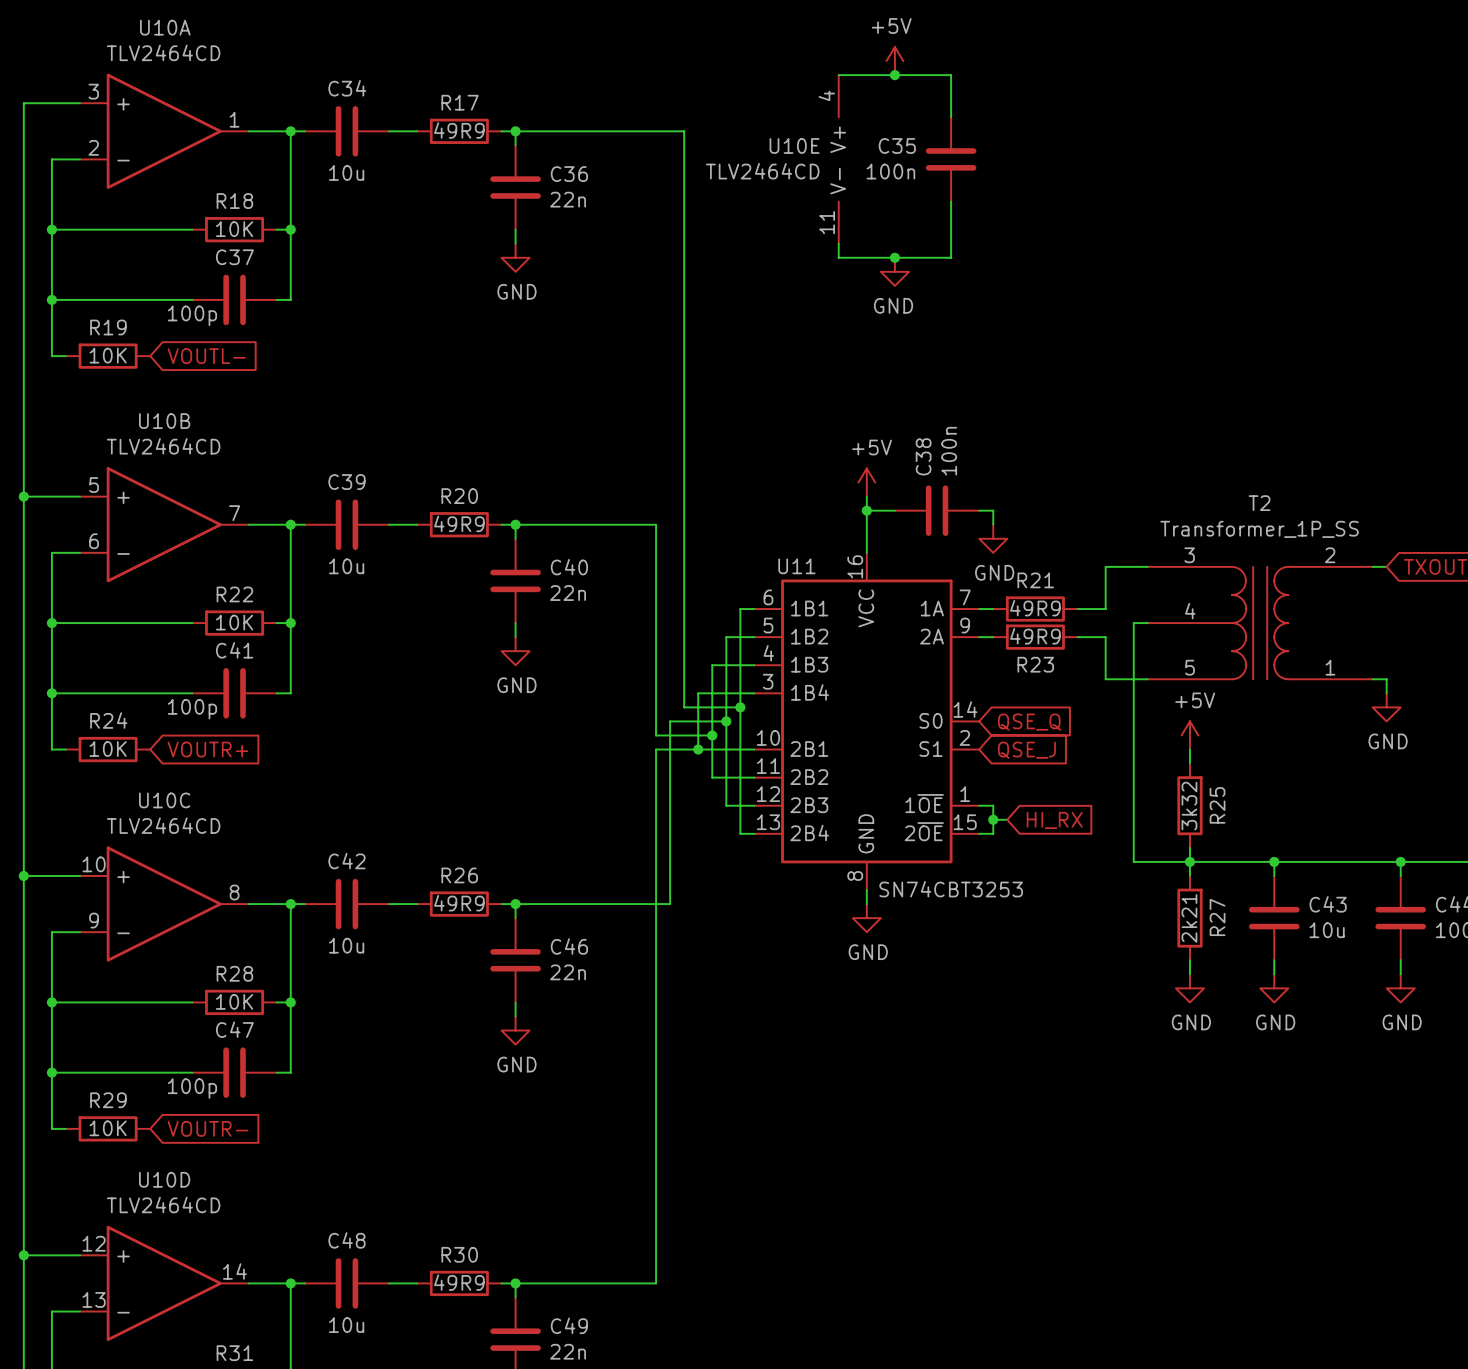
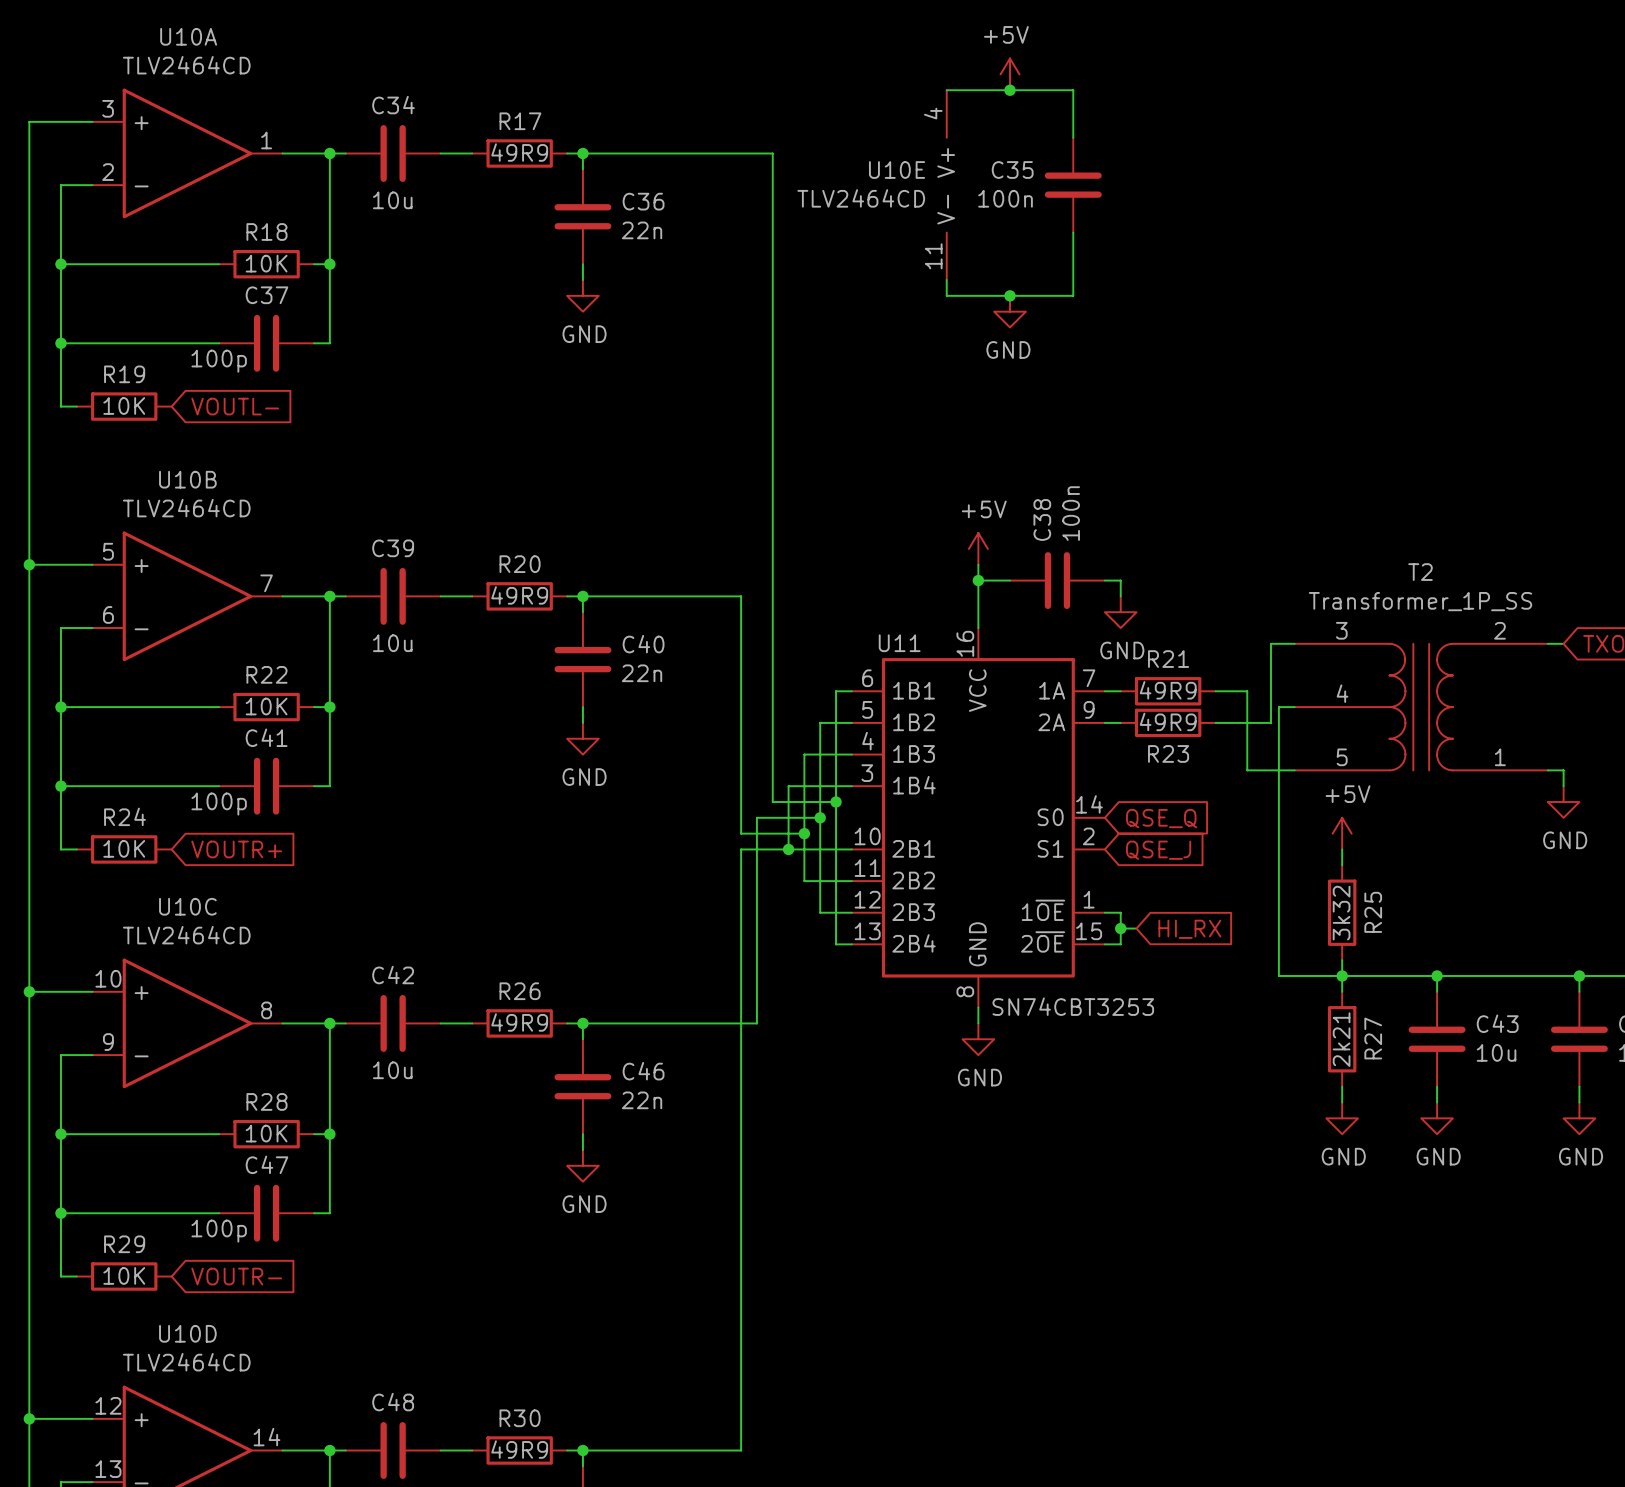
wire: (1126, 566) (1105, 566) (1105, 609) -> (1270, 643) (1270, 722) (1247, 722) (1247, 691)

